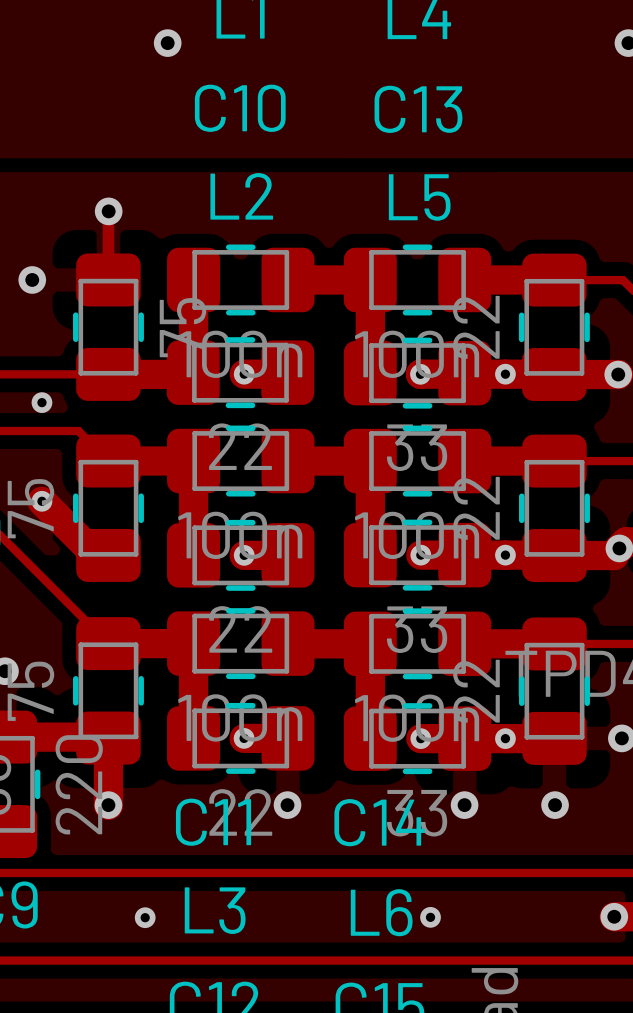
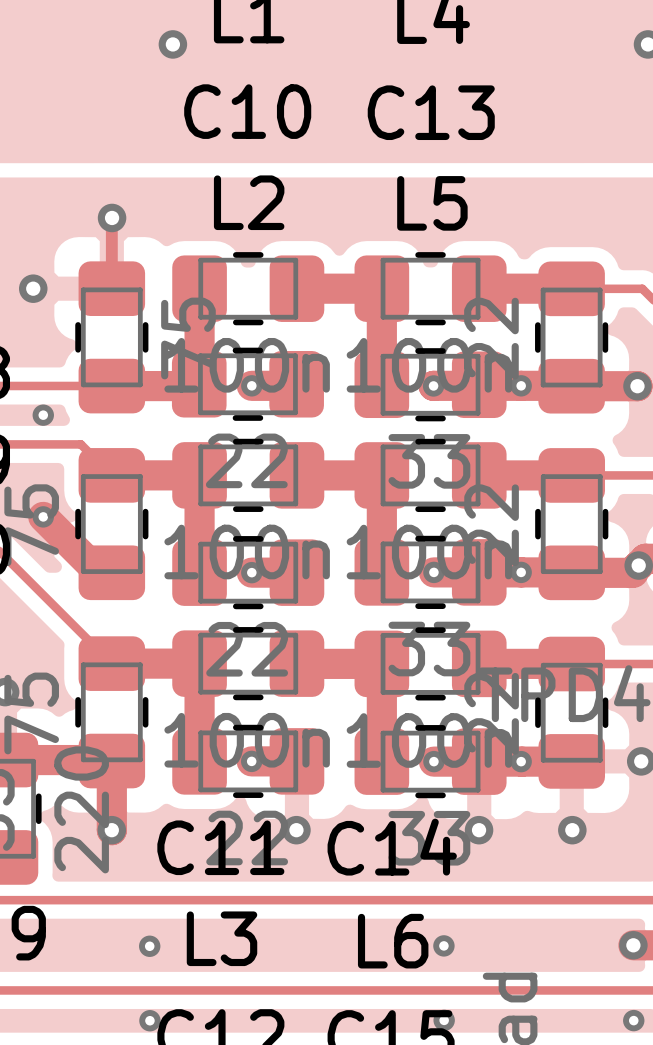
via: none -> (149, 1020)
via: none -> (444, 1020)
via: none -> (633, 1020)

